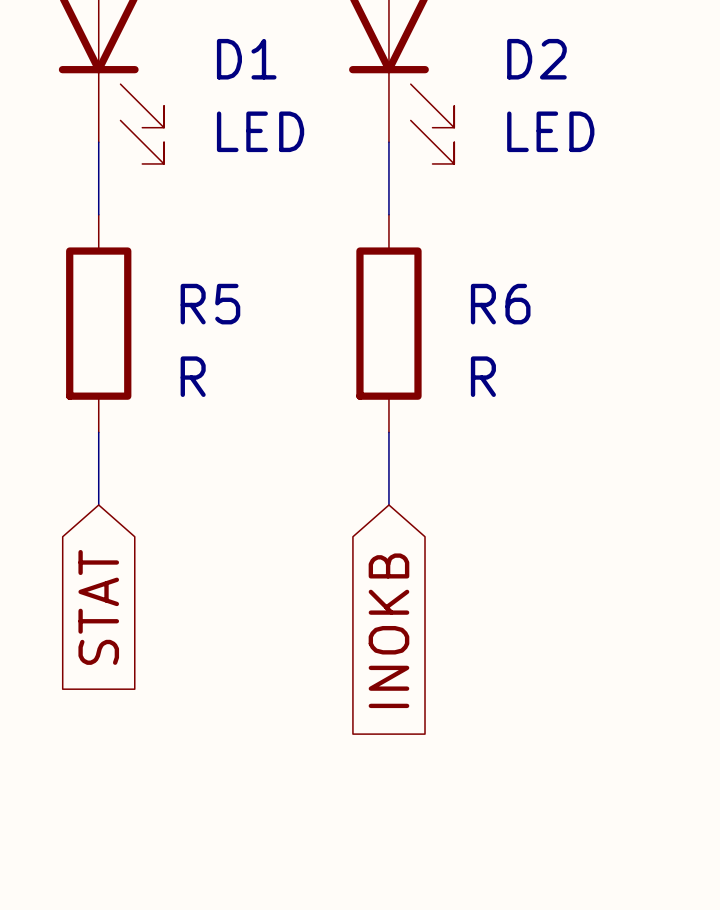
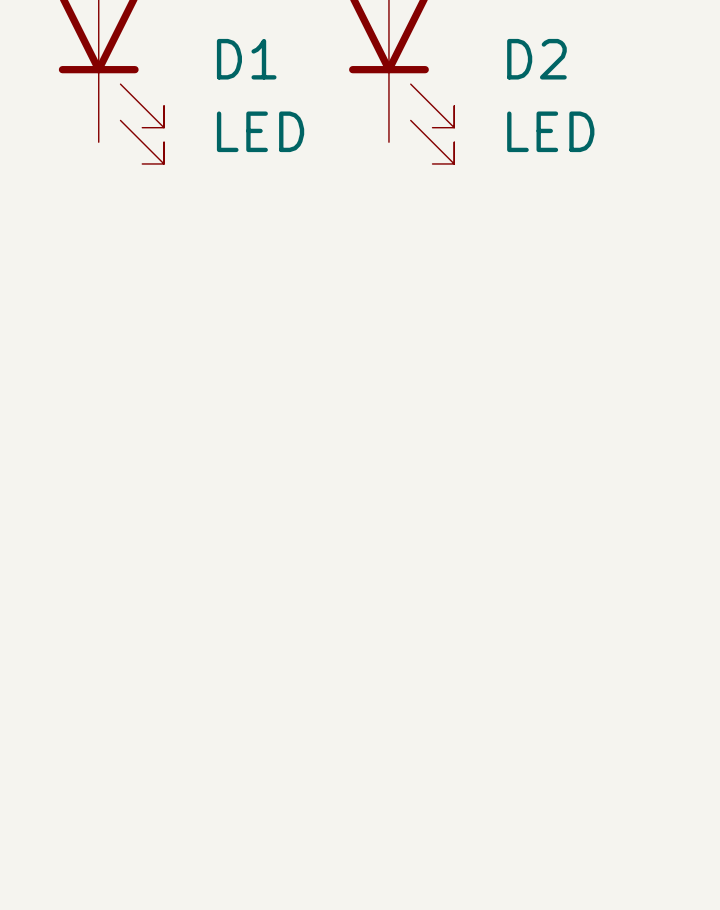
wire: (98, 142) (98, 214) -> none
wire: (388, 142) (388, 214) -> none
R5: R (98, 323) -> none
R6: R (388, 323) -> none
wire: (98, 432) (98, 505) -> none
wire: (388, 432) (388, 505) -> none
global label: STAT (98, 607) -> none
global label: INOKB (388, 630) -> none

